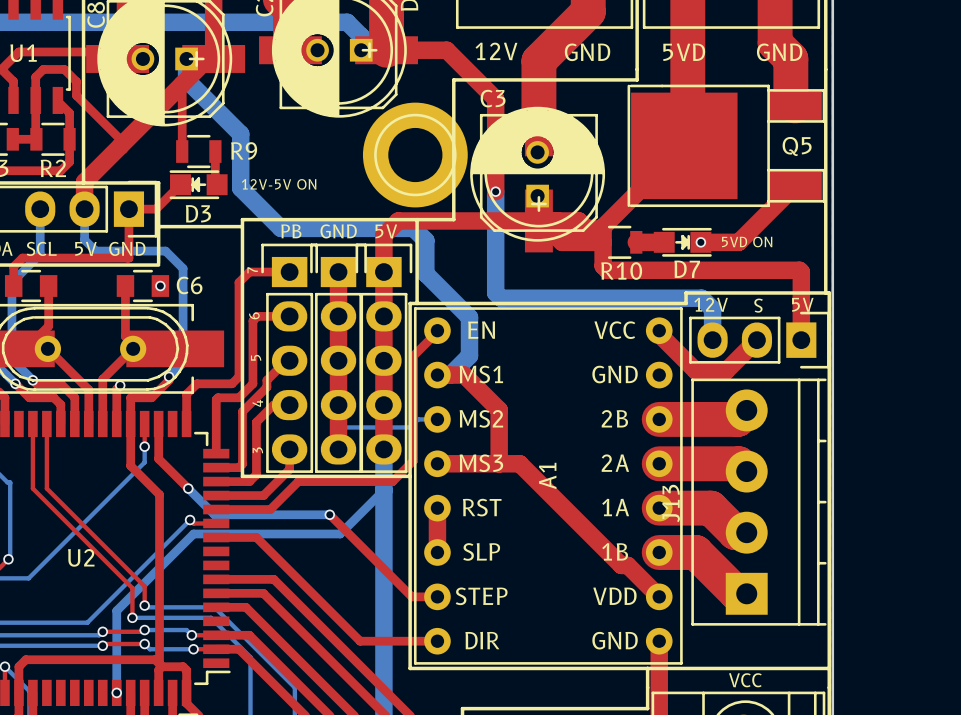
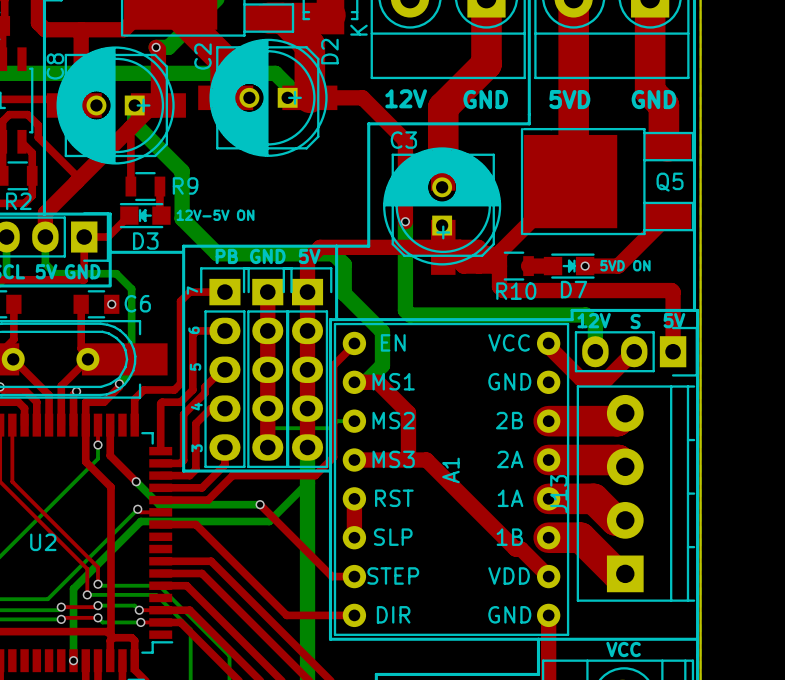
part: (415, 155) -> none

